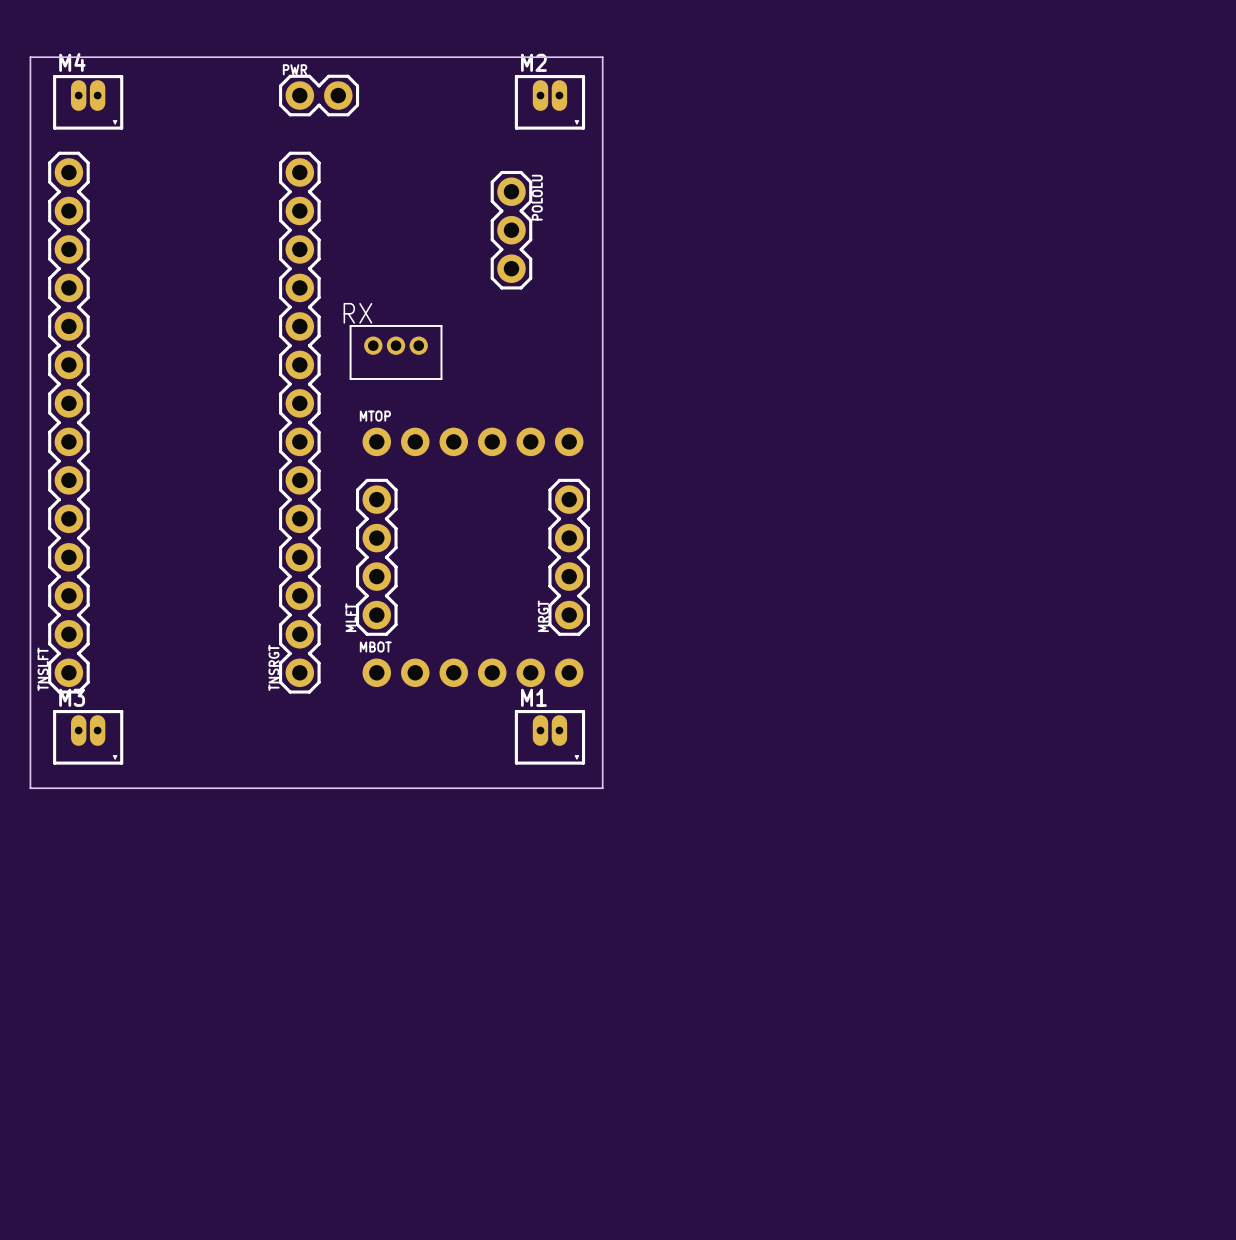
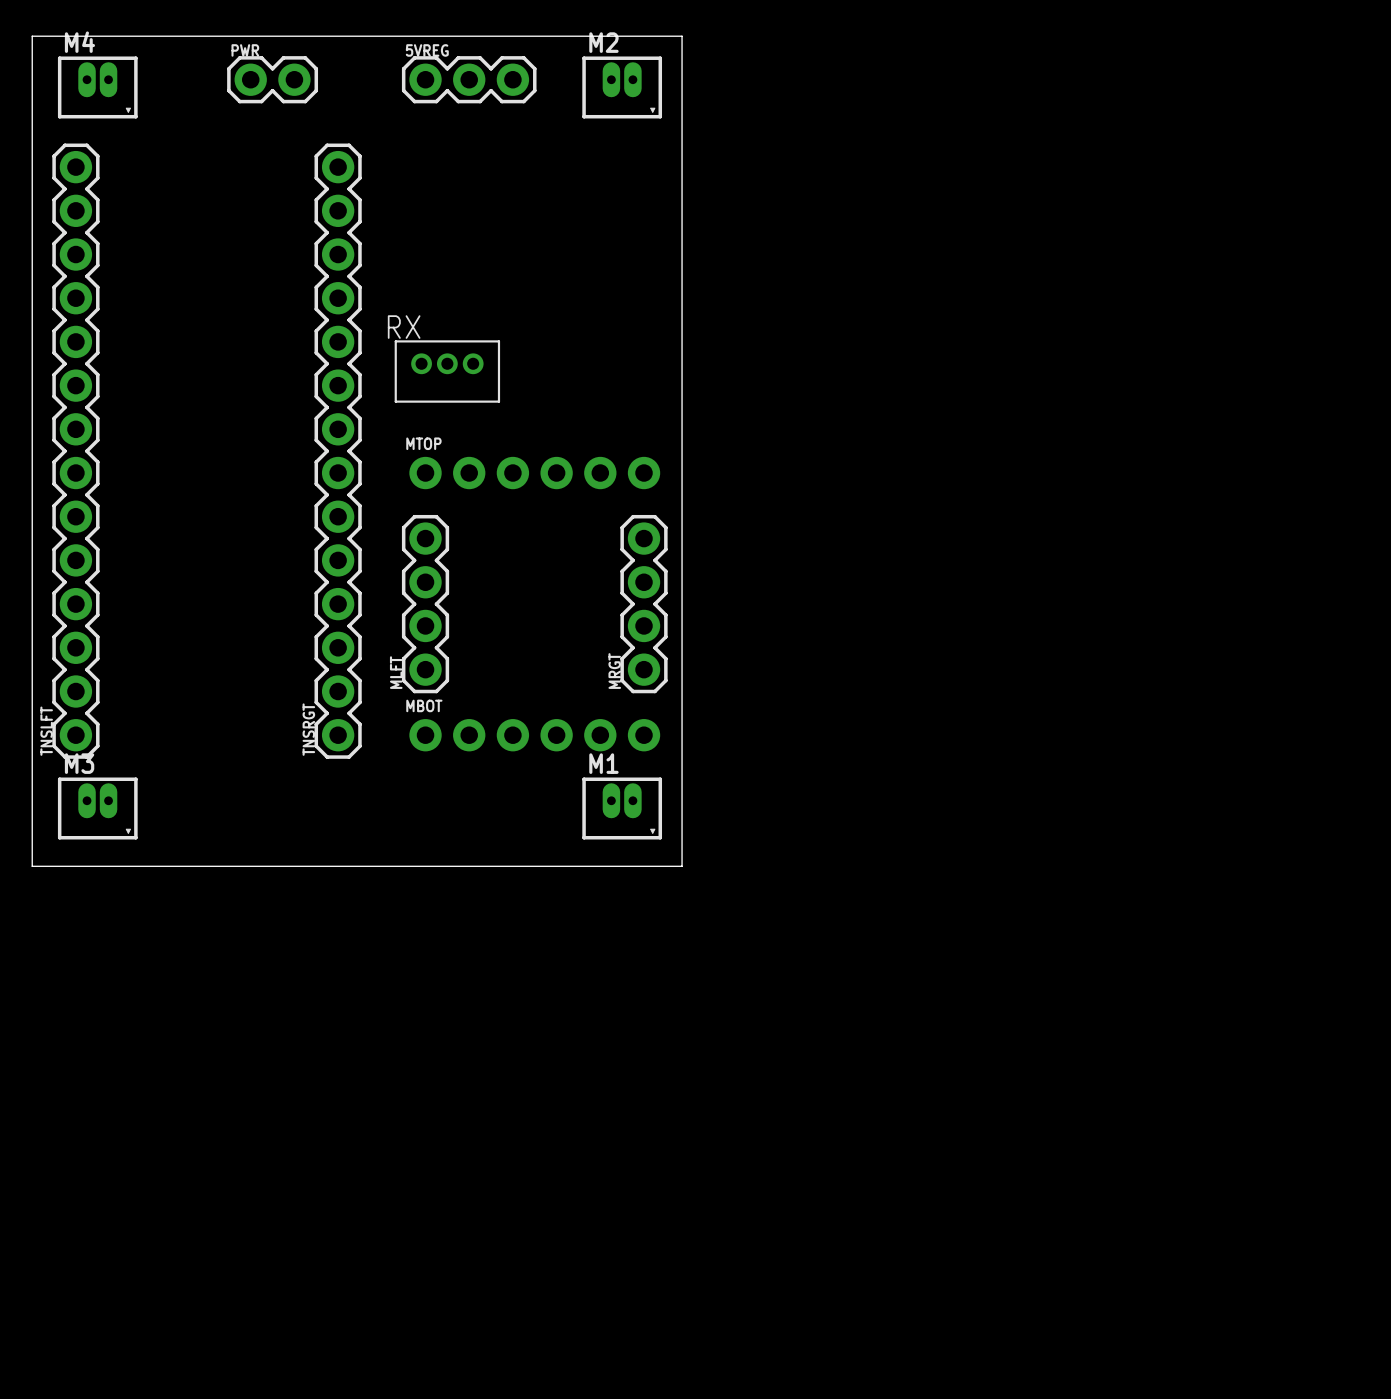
PWR position: (319, 95) -> (272, 79)
5VREG: none -> (469, 79)
POLOLU: (511, 230) -> none

